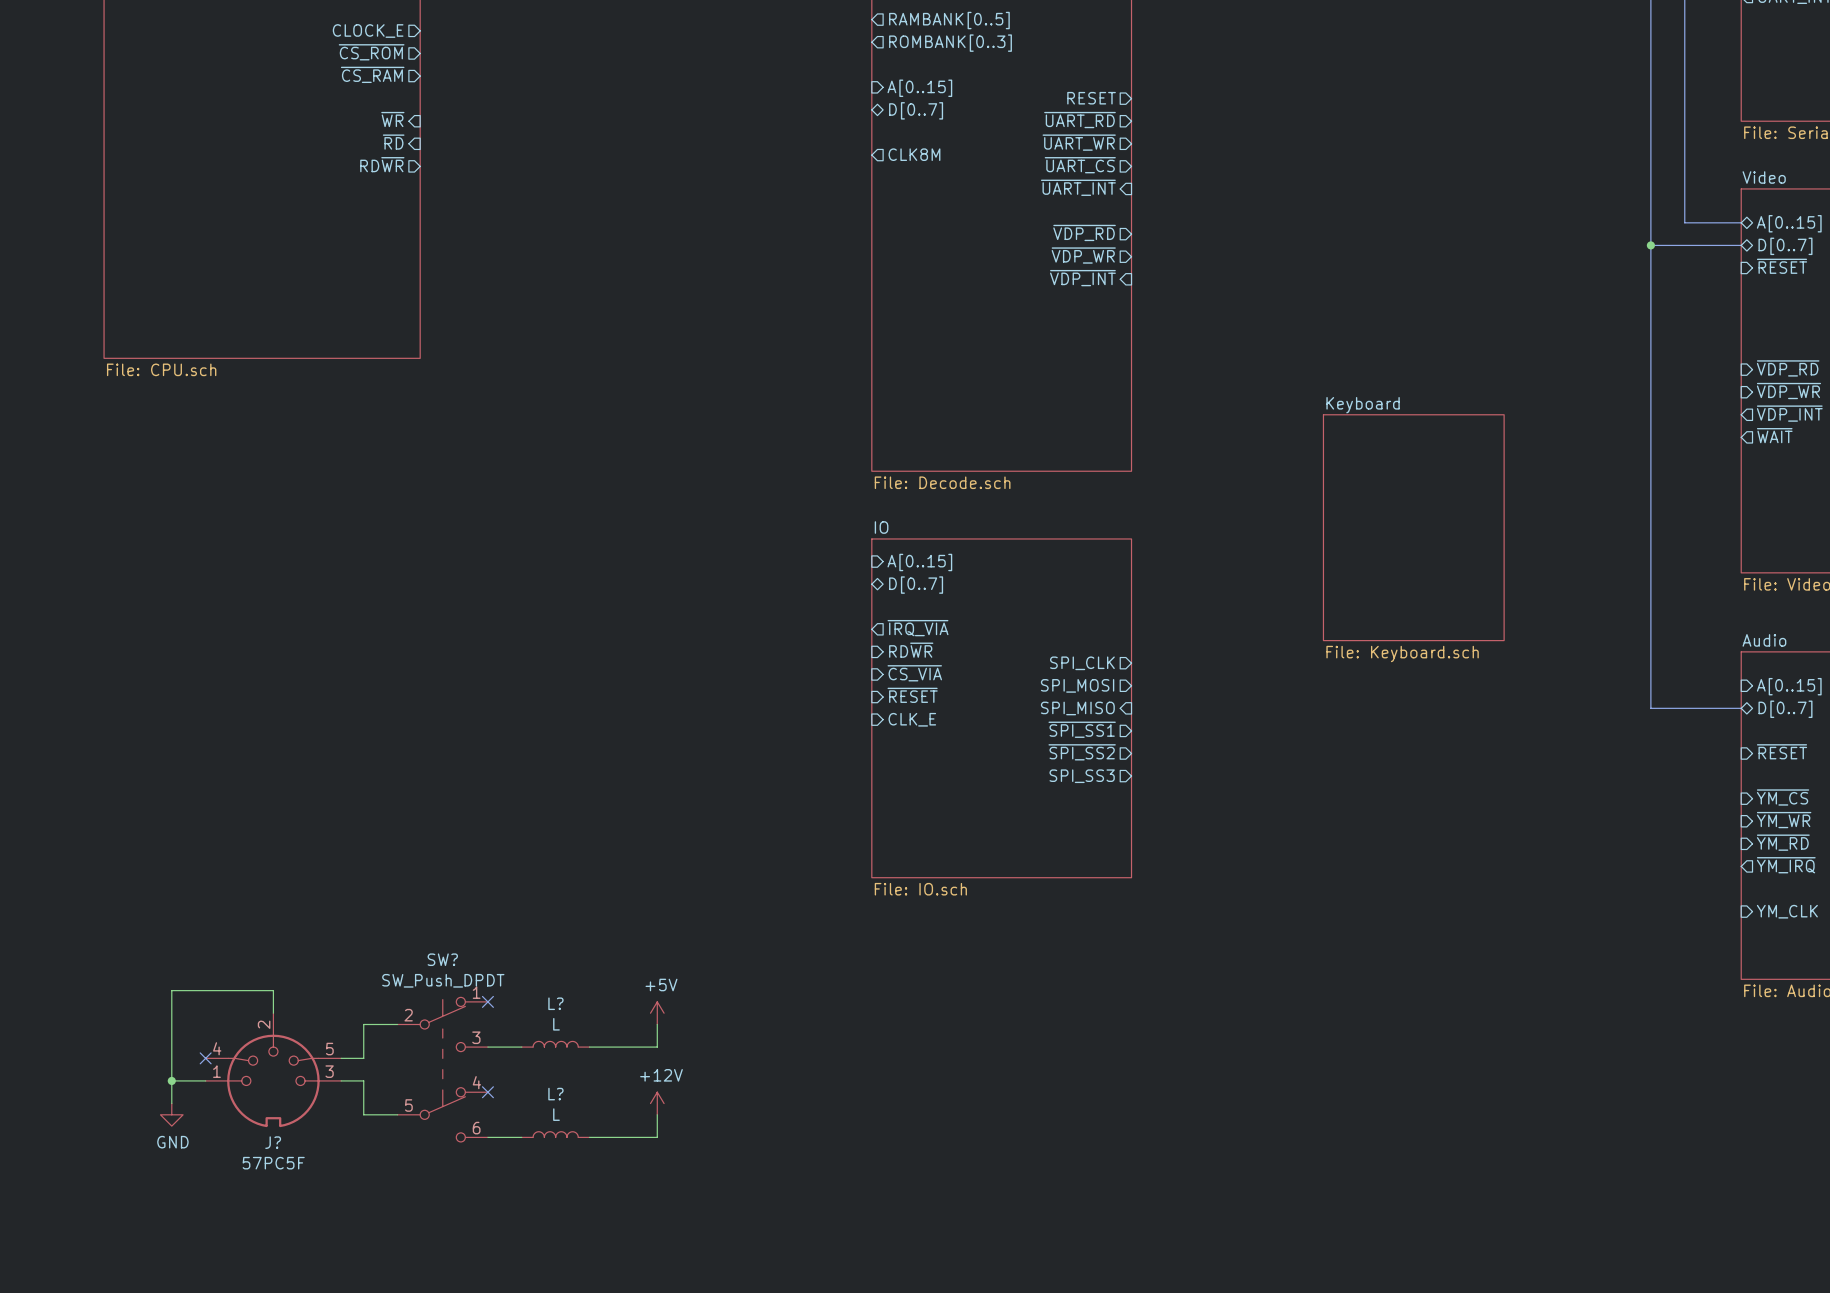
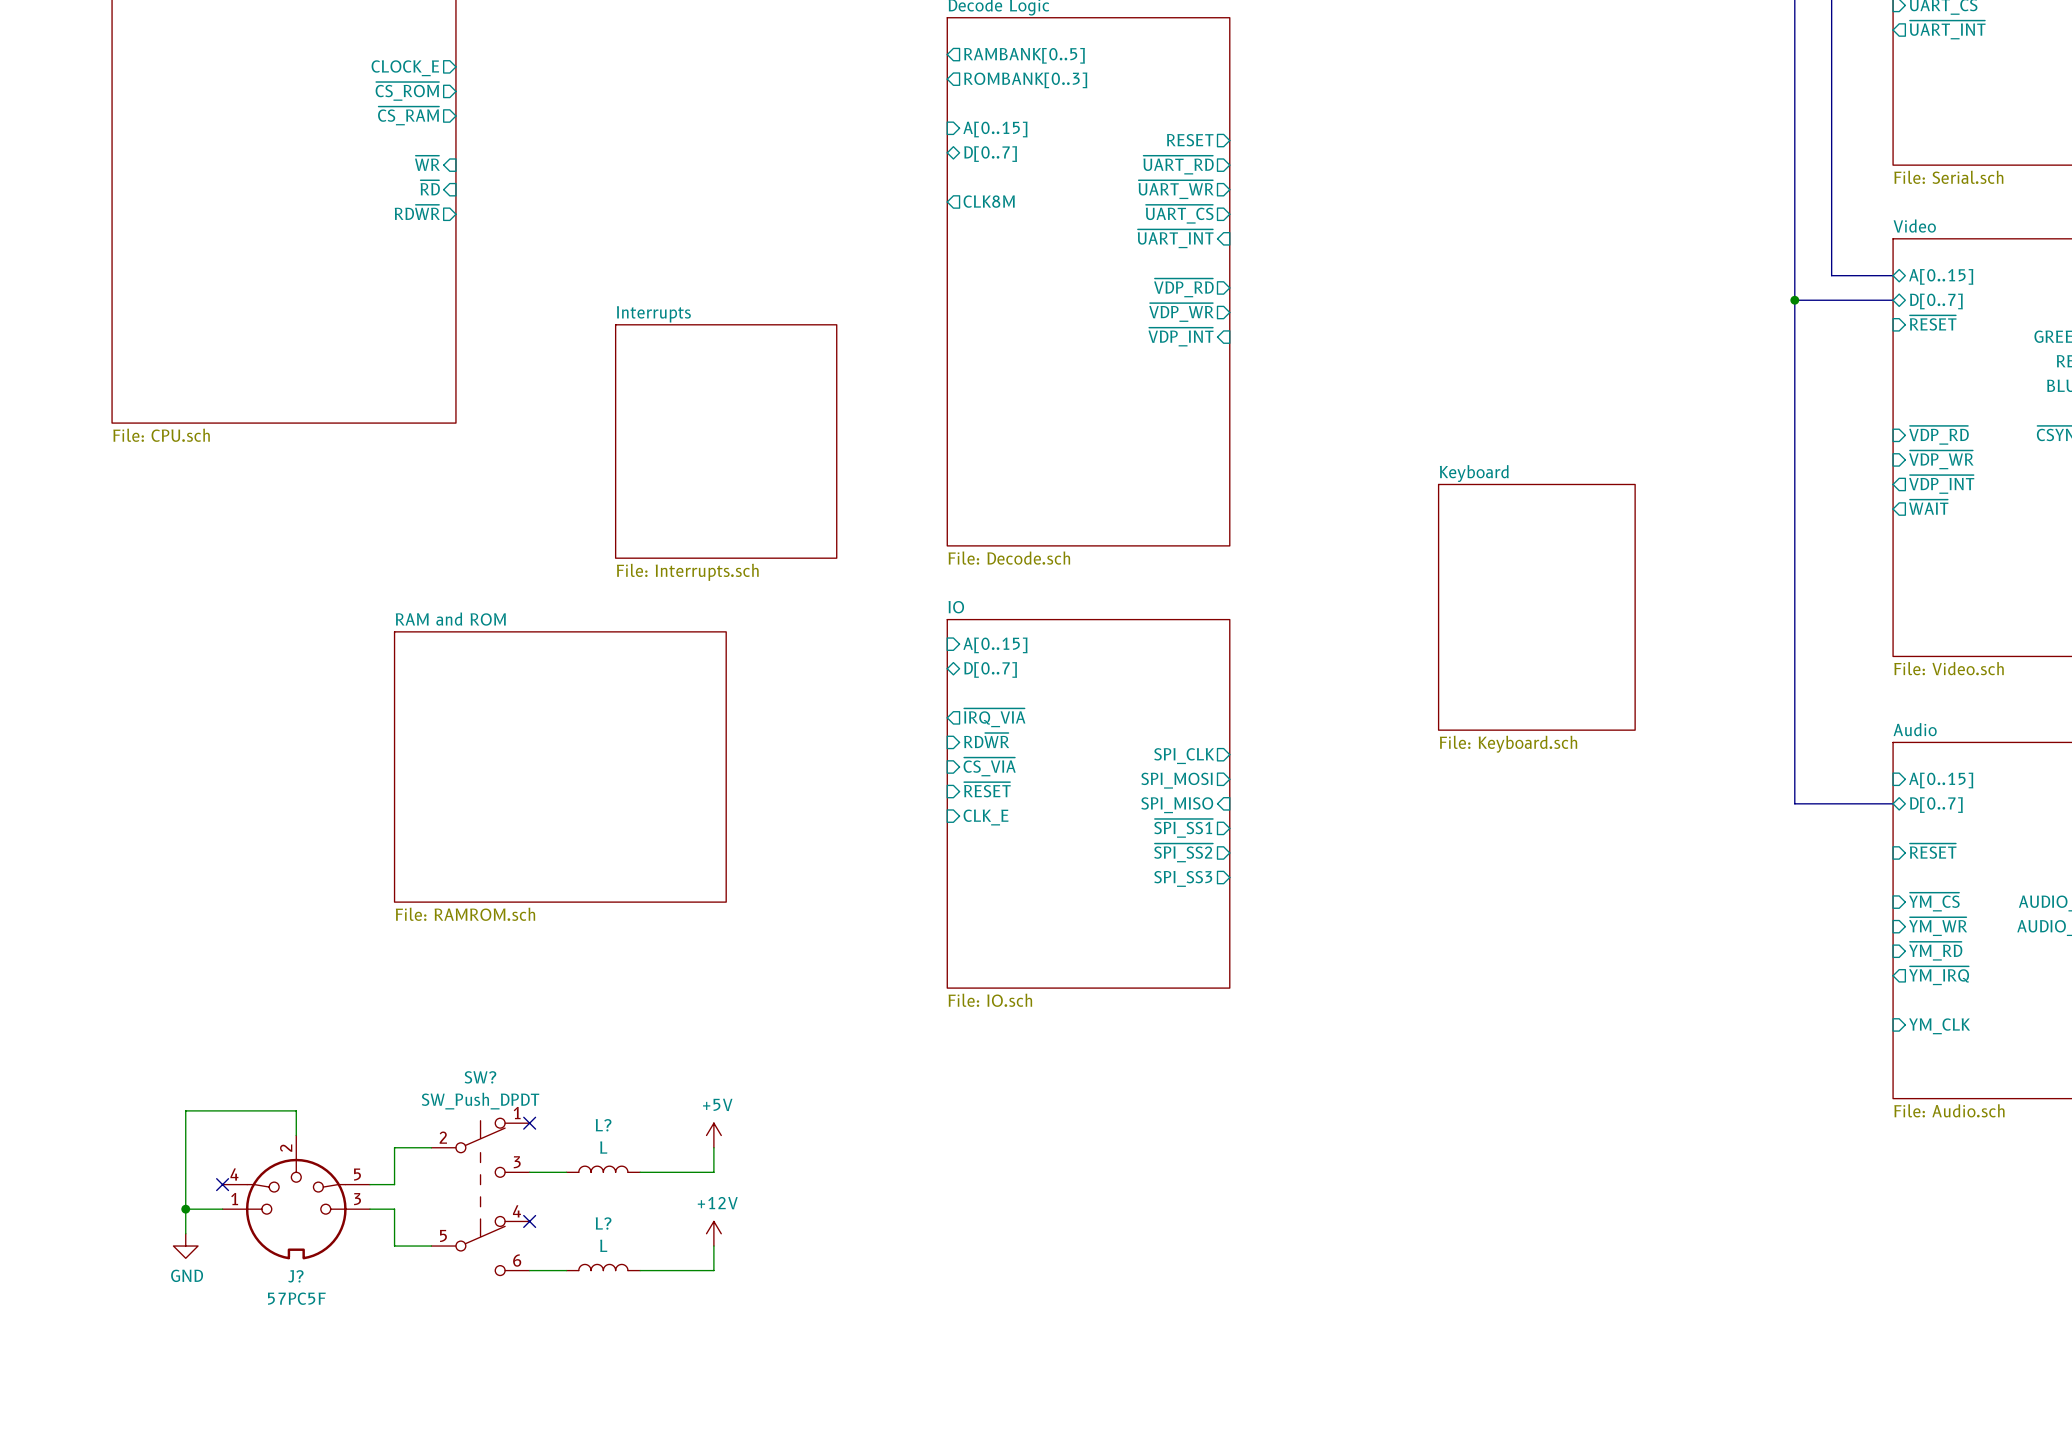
sheet Interrupts: none -> File: Interrupts.sch (726, 441)
sheet RAM and ROM: none -> File: RAMROM.sch (560, 766)

